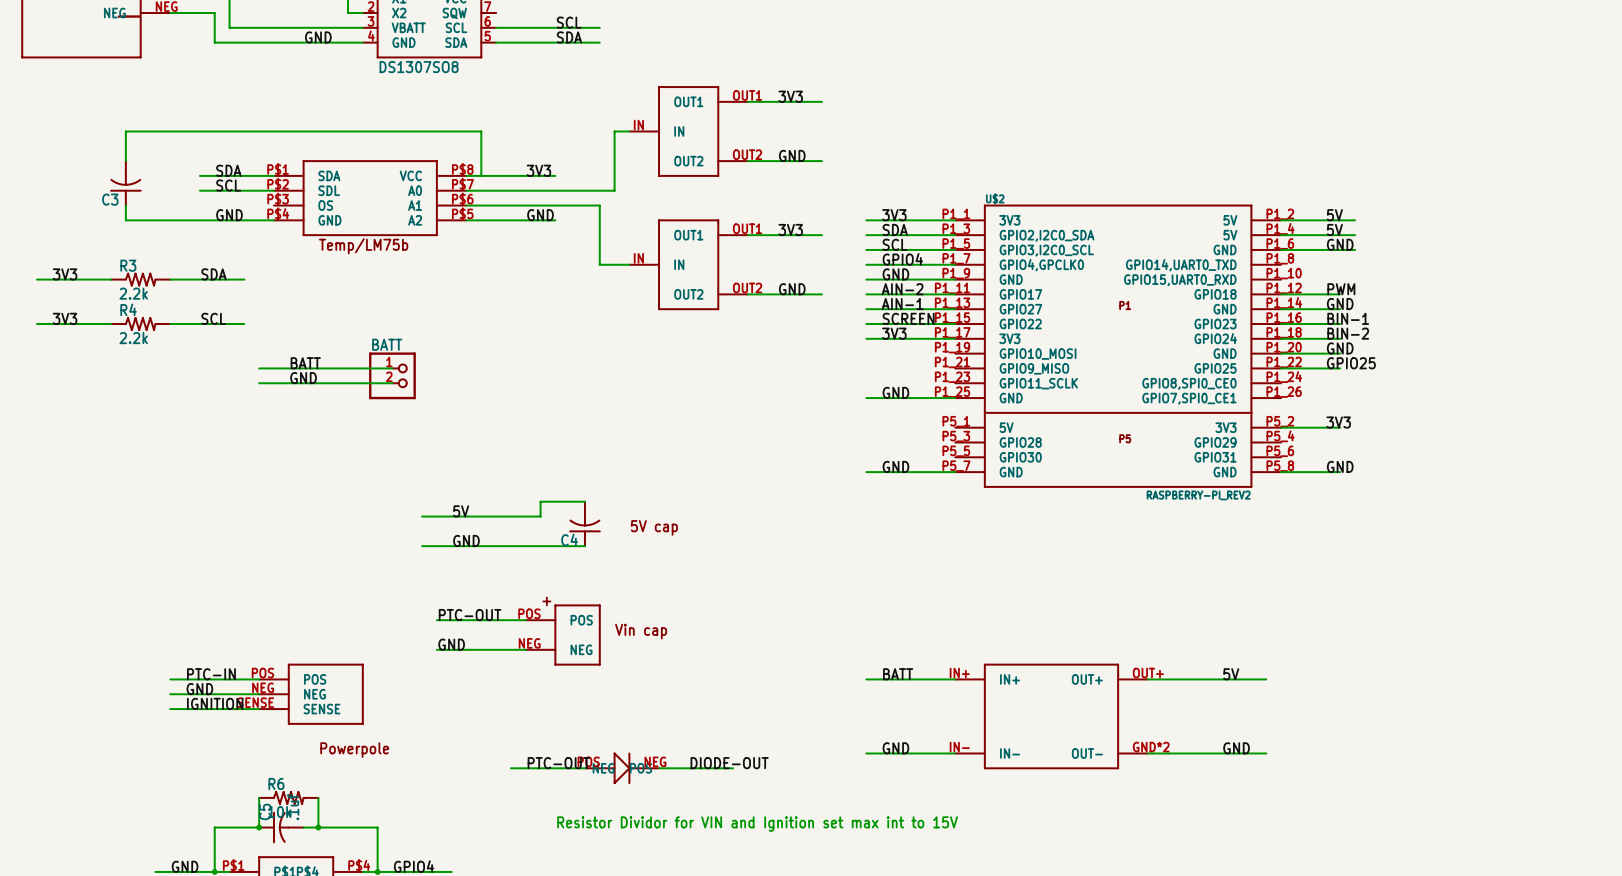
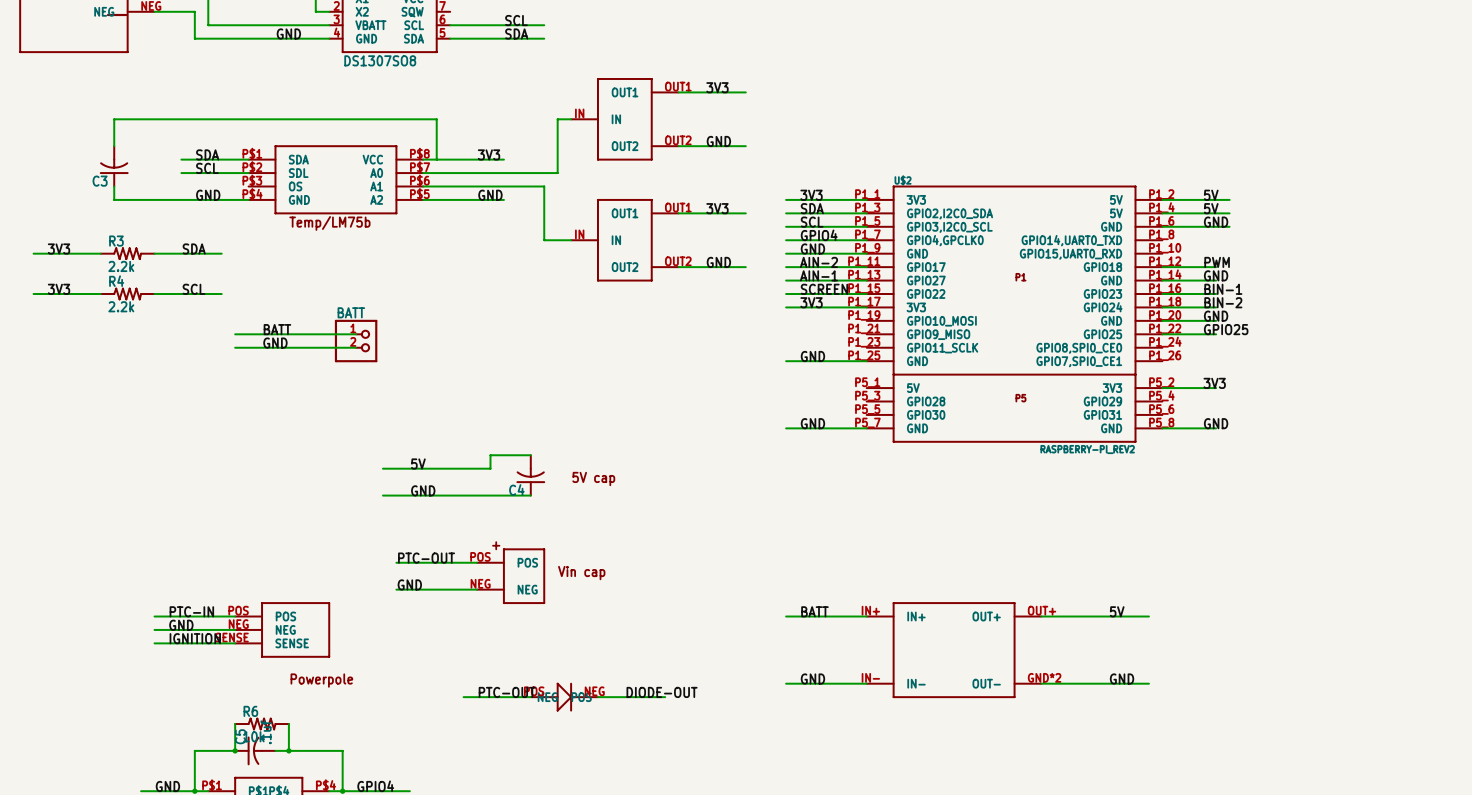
text: Resistor Dividor for VIN and Ignition set max int to 15V (757, 824) -> none

